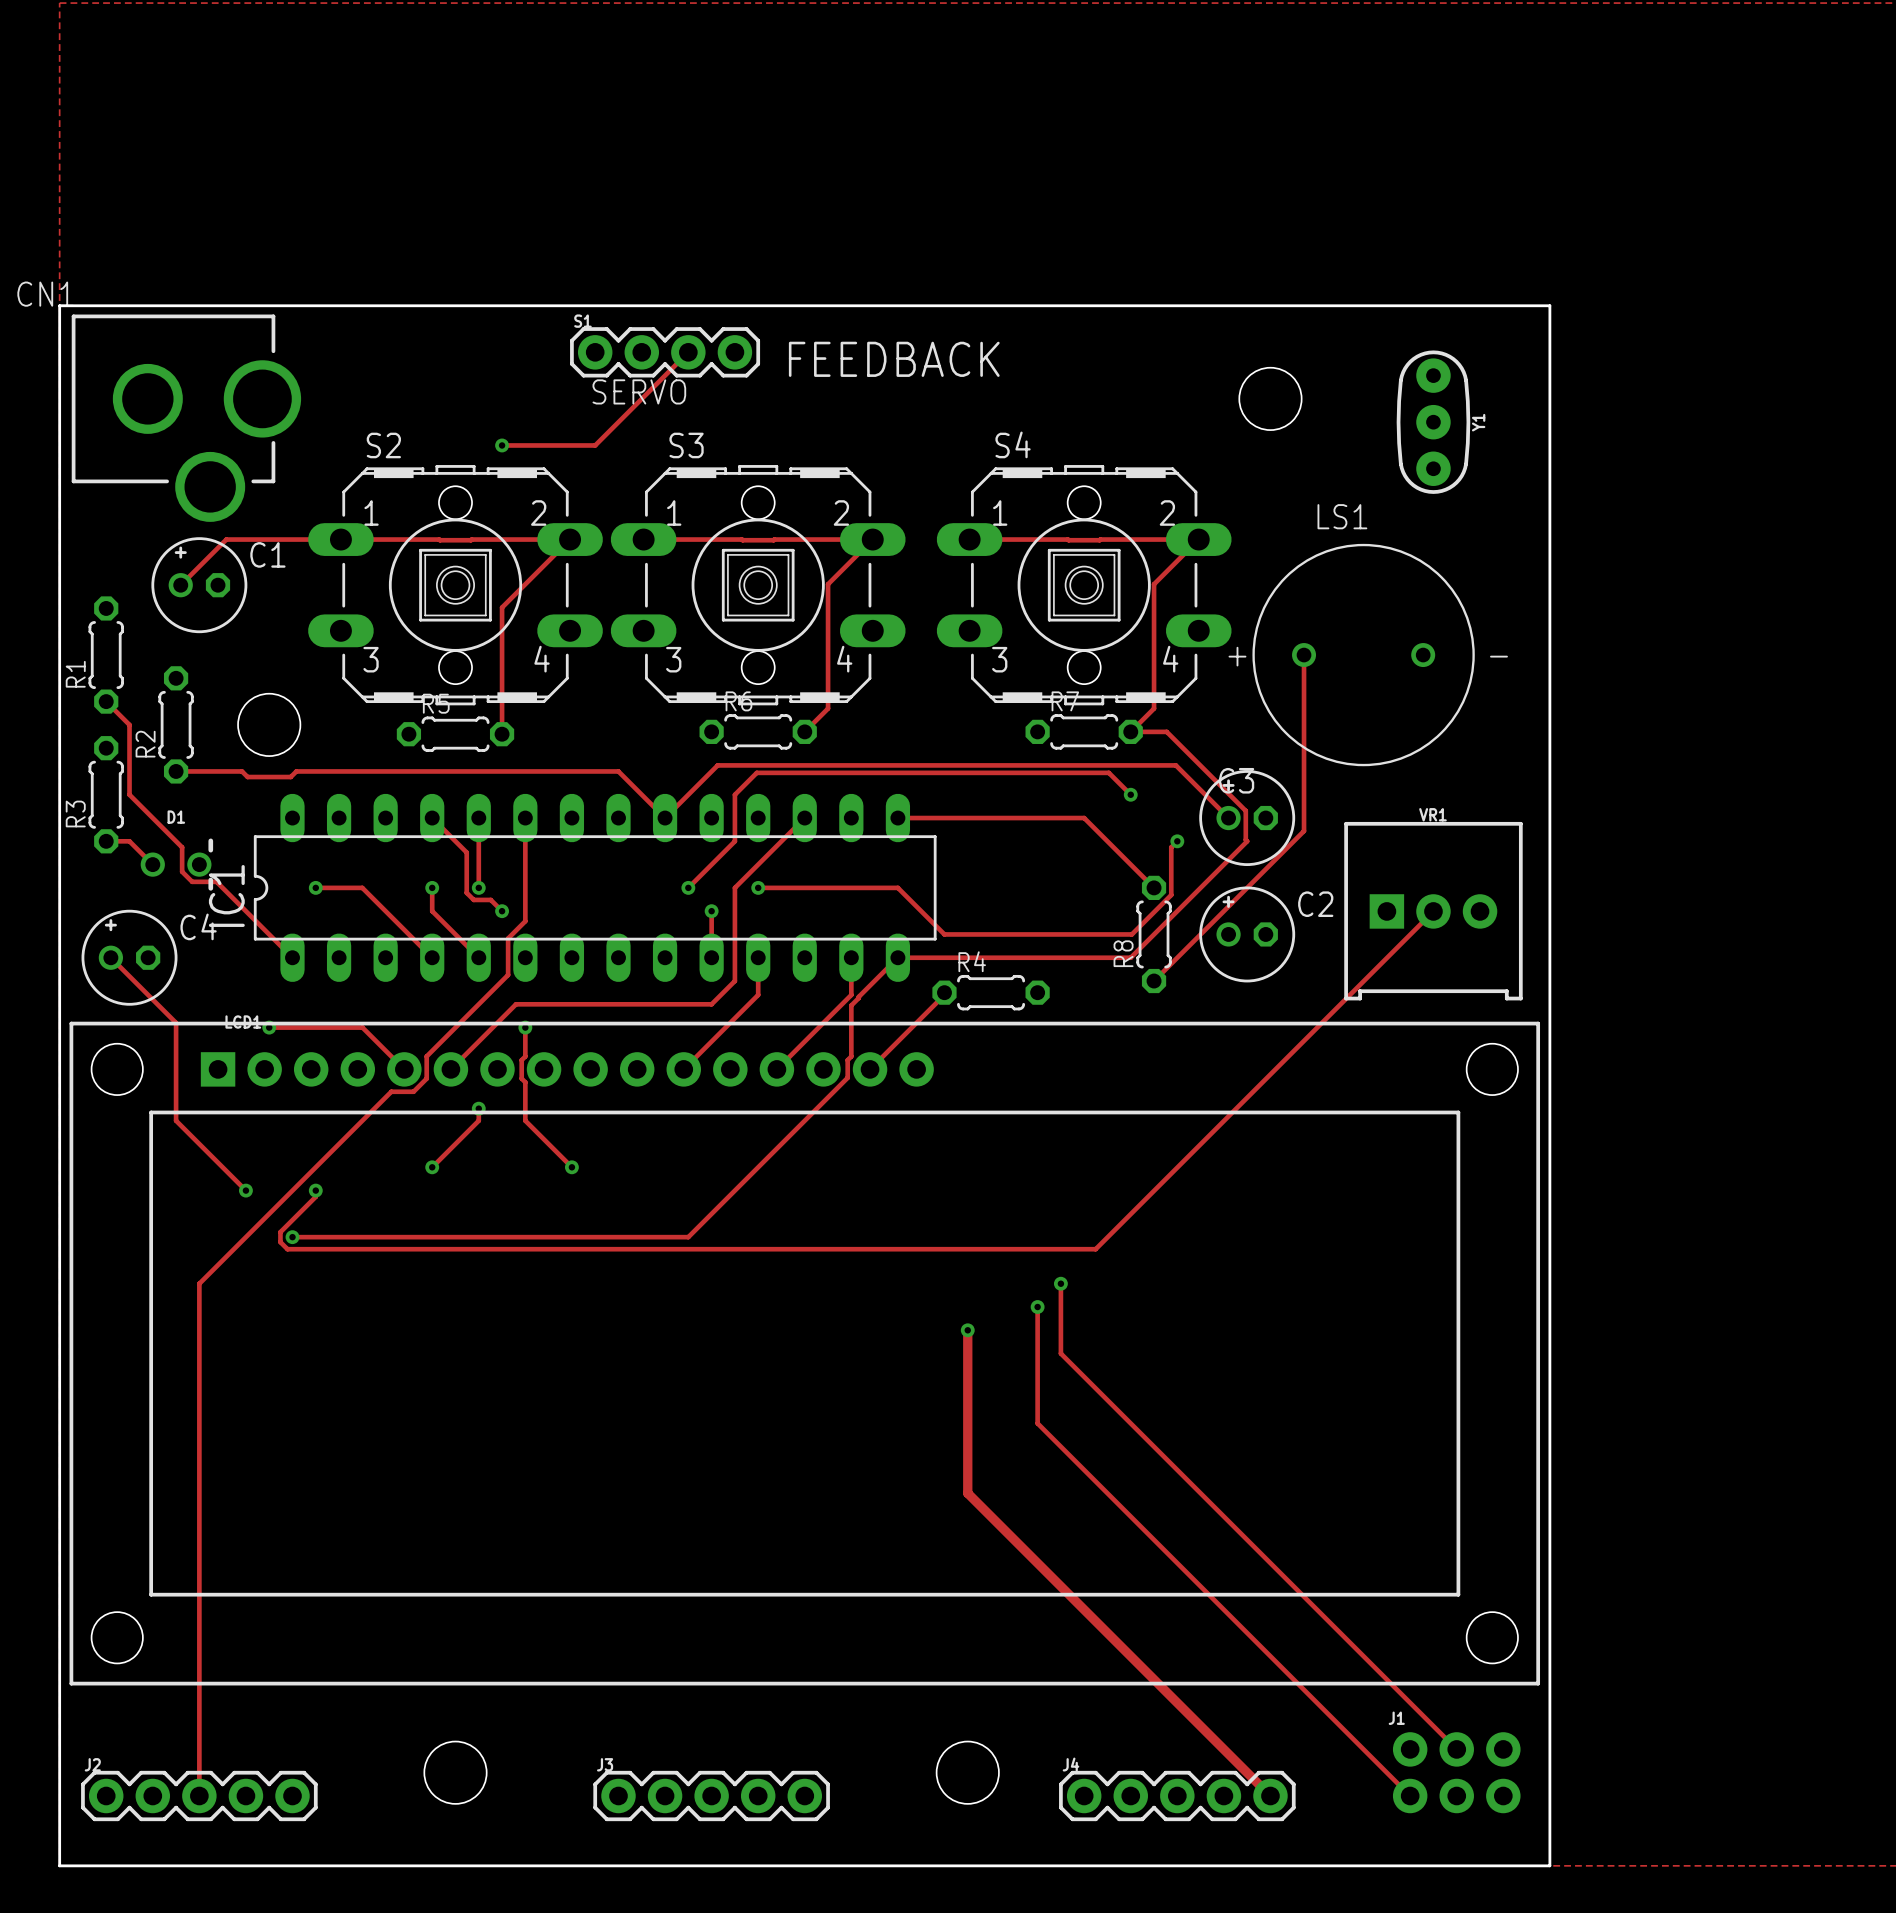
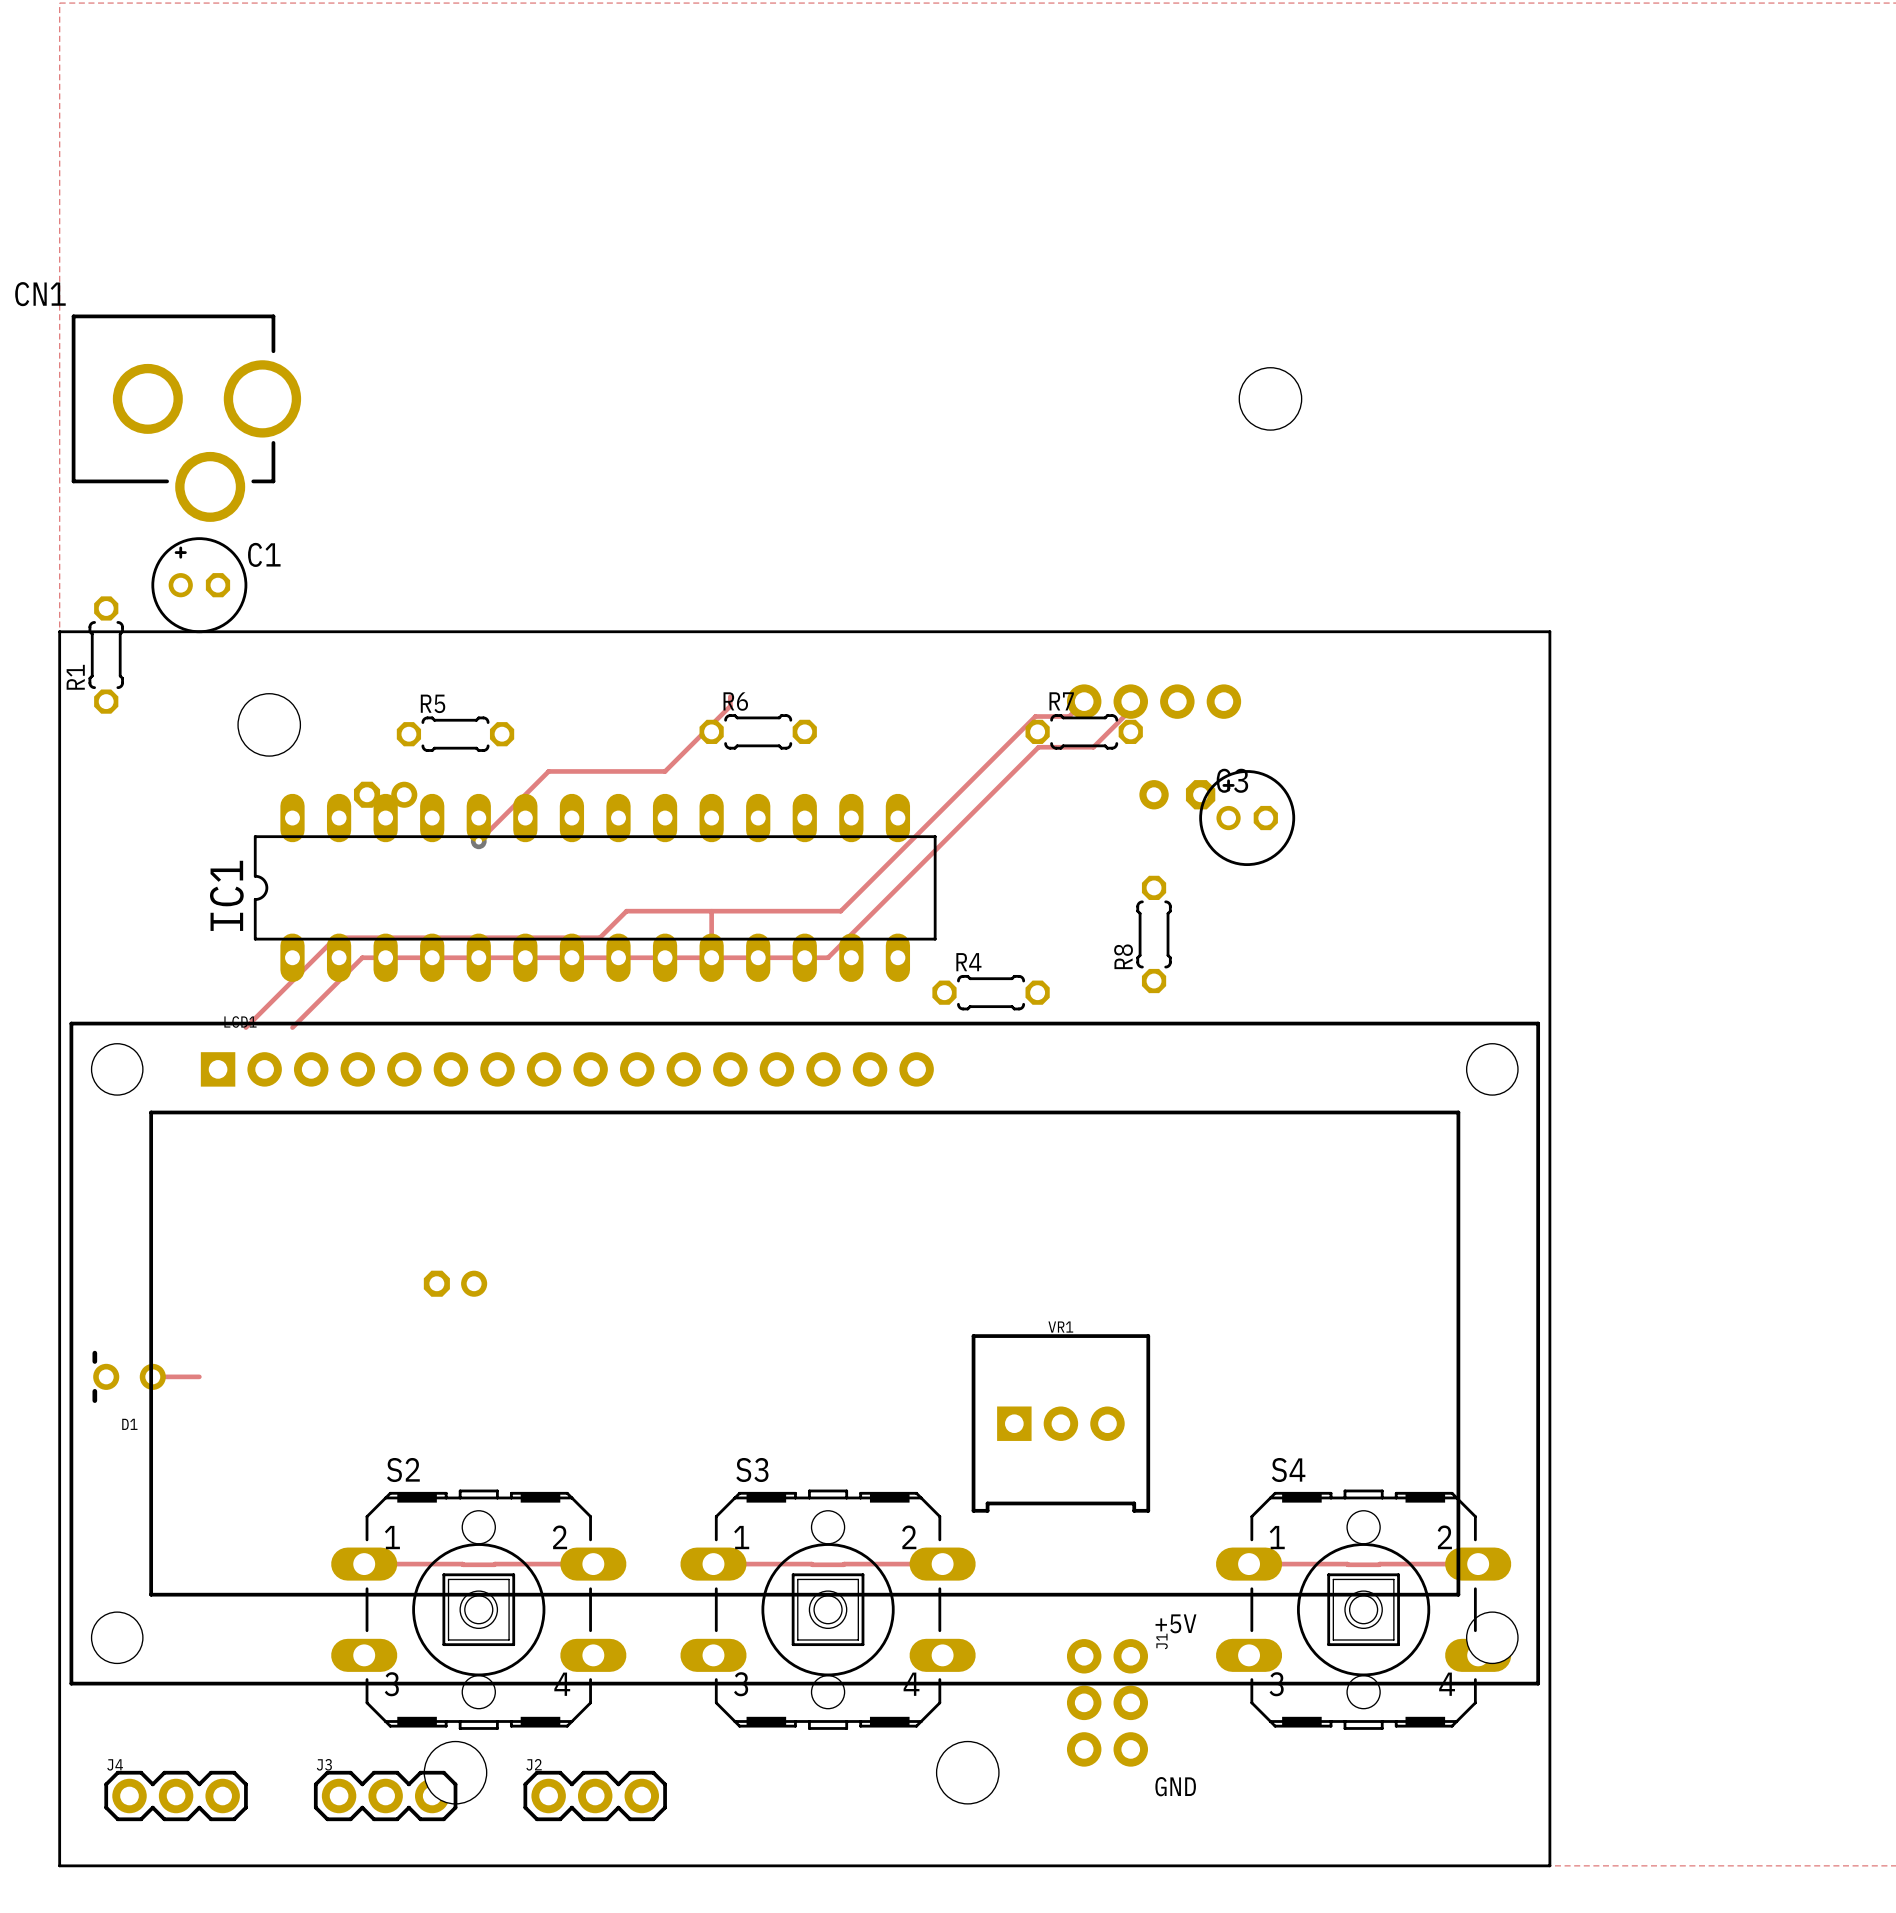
S1: (665, 352) -> none
track: (688, 352) (595, 445) (502, 445) -> none
text: FEEDBACK (894, 359) -> none
text: SERVO (639, 391) -> none
Y1: (1433, 422) -> none
via: (502, 445) -> none
S2 footprint: [308, 465, 603, 706] -> [331, 1489, 627, 1730]
S3 footprint: [610, 465, 906, 706] -> [680, 1489, 976, 1730]
S4 footprint: [936, 465, 1232, 706] -> [1215, 1489, 1512, 1730]
track: (643, 539) (872, 539) (828, 584) (828, 708) (804, 731) -> none
track: (969, 539) (1198, 539) (1154, 584) (1154, 708) (1130, 731) (1166, 731) (1245, 810) (1247, 841) (1130, 957) (897, 957) (851, 1005) (851, 1056) (847, 1060) (847, 1077) (688, 1237) (292, 1237) -> none
track: (180, 585) (226, 539) (570, 539) (502, 607) (502, 734) -> none
board edge: (59, 631) (59, 305) (1549, 305) (1549, 631) -> (59, 631) (1549, 631)
track: (1304, 655) (1304, 831) (1154, 981) -> none
LS1: (1363, 655) -> none
track: (106, 701) (129, 724) (129, 794) (182, 847) (182, 871) (192, 881) (216, 881) (292, 957) -> none
track: none -> (1084, 701) (1069, 716) (1035, 716) (840, 911) (626, 911) (600, 937) (335, 937) (245, 1027)
track: none -> (1130, 701) (1130, 709) (1093, 747) (1038, 747) (828, 957) (362, 957) (292, 1027)
part: none -> (1154, 701)
R2: (176, 724) -> none
track: (176, 771) (242, 771) (247, 777) (290, 777) (296, 771) (548, 771) -> (478, 841) (548, 771)
track: (618, 771) (665, 818) (717, 765) (1175, 765) (1228, 818) -> (618, 771) (665, 771) (730, 706) (730, 696)
R3: (106, 794) -> none
part: none -> (385, 794)
track: (1130, 794) (1108, 772) (756, 772) (734, 794) (734, 841) (688, 887) -> none
via: (1130, 794) -> none
part: none -> (1177, 794)
D1 name position: D1 (176, 817) -> D1 (129, 1424)
track: (432, 818) (466, 852) (466, 892) (473, 899) (490, 899) (502, 911) -> none
track: (478, 818) (478, 887) -> none
track: (525, 818) (525, 921) (508, 938) (508, 974) (426, 1056) (426, 1078) (413, 1091) (391, 1091) (199, 1283) (199, 1796) -> none
track: (804, 818) (734, 887) (734, 981) (711, 1004) (516, 1004) (450, 1069) -> none
track: (897, 818) (1084, 818) (1154, 887) -> none
D1 footprint: [140, 838, 214, 891] -> [92, 1350, 166, 1403]
track: (106, 841) (129, 841) (152, 864) -> none
via: none -> (478, 841)
track: (1177, 841) (1171, 847) (1171, 895) (1131, 934) (944, 934) (897, 887) (758, 887) -> none
via: (1177, 841) -> none
track: (315, 887) (362, 887) (432, 957) -> none
via: (315, 887) -> none
track: (432, 887) (432, 911) (478, 957) -> none
via: (432, 887) -> none
via: (478, 887) -> none
via: (688, 887) -> none
via: (758, 887) -> none
via: (502, 911) -> none
via: (711, 911) -> none
track: (1433, 911) (1095, 1249) (287, 1249) (280, 1242) (280, 1232) (315, 1196) (315, 1190) -> none
VR1 position: (1433, 911) -> (1060, 1423)
C2: (1247, 934) -> none
track: (110, 957) (176, 1022) (176, 1120) (245, 1190) -> none
C4: (129, 957) -> none
track: (758, 957) (758, 994) (683, 1069) -> none
track: (851, 957) (851, 994) (776, 1069) -> none
track: (944, 992) (945, 994) (870, 1069) -> none
track: (269, 1027) (362, 1027) (404, 1069) -> none
via: (269, 1027) -> none
track: (525, 1027) (525, 1056) (521, 1060) (521, 1078) (525, 1082) (525, 1120) (571, 1167) -> none
via: (525, 1027) -> none
track: (478, 1108) (478, 1120) (432, 1167) -> none
via: (478, 1108) -> none
via: (432, 1167) -> none
via: (571, 1167) -> none
via: (245, 1190) -> none
via: (315, 1190) -> none
via: (292, 1237) -> none
part: none -> (455, 1283)
track: (1060, 1283) (1060, 1353) (1456, 1749) -> none
via: (1060, 1283) -> none
track: (1037, 1307) (1037, 1423) (1410, 1796) -> none
via: (1037, 1307) -> none
track: (967, 1330) (967, 1493) (1270, 1796) -> none
via: (967, 1330) -> none
track: none -> (152, 1376) (199, 1376)
track: none -> (364, 1564) (593, 1564)
track: none -> (713, 1564) (942, 1564)
track: none -> (1249, 1564) (1478, 1564)
text: none -> +5V (1175, 1623)
J2 name position: J2 (92, 1764) -> J2 (534, 1764)
J3 name position: J3 (605, 1764) -> J3 (324, 1764)
J4 name position: J4 (1071, 1764) -> J4 (115, 1764)
J2 footprint: [81, 1770, 318, 1822] -> [523, 1770, 667, 1822]
J3 footprint: [593, 1770, 830, 1822] -> [313, 1770, 458, 1822]
J4 footprint: [1059, 1770, 1296, 1822] -> [104, 1770, 248, 1822]
J1 rotation: 0° (1456, 1772) -> 90° clockwise (1107, 1702)
J1 position: (1456, 1772) -> (1107, 1702)
text: none -> GND (1175, 1786)

